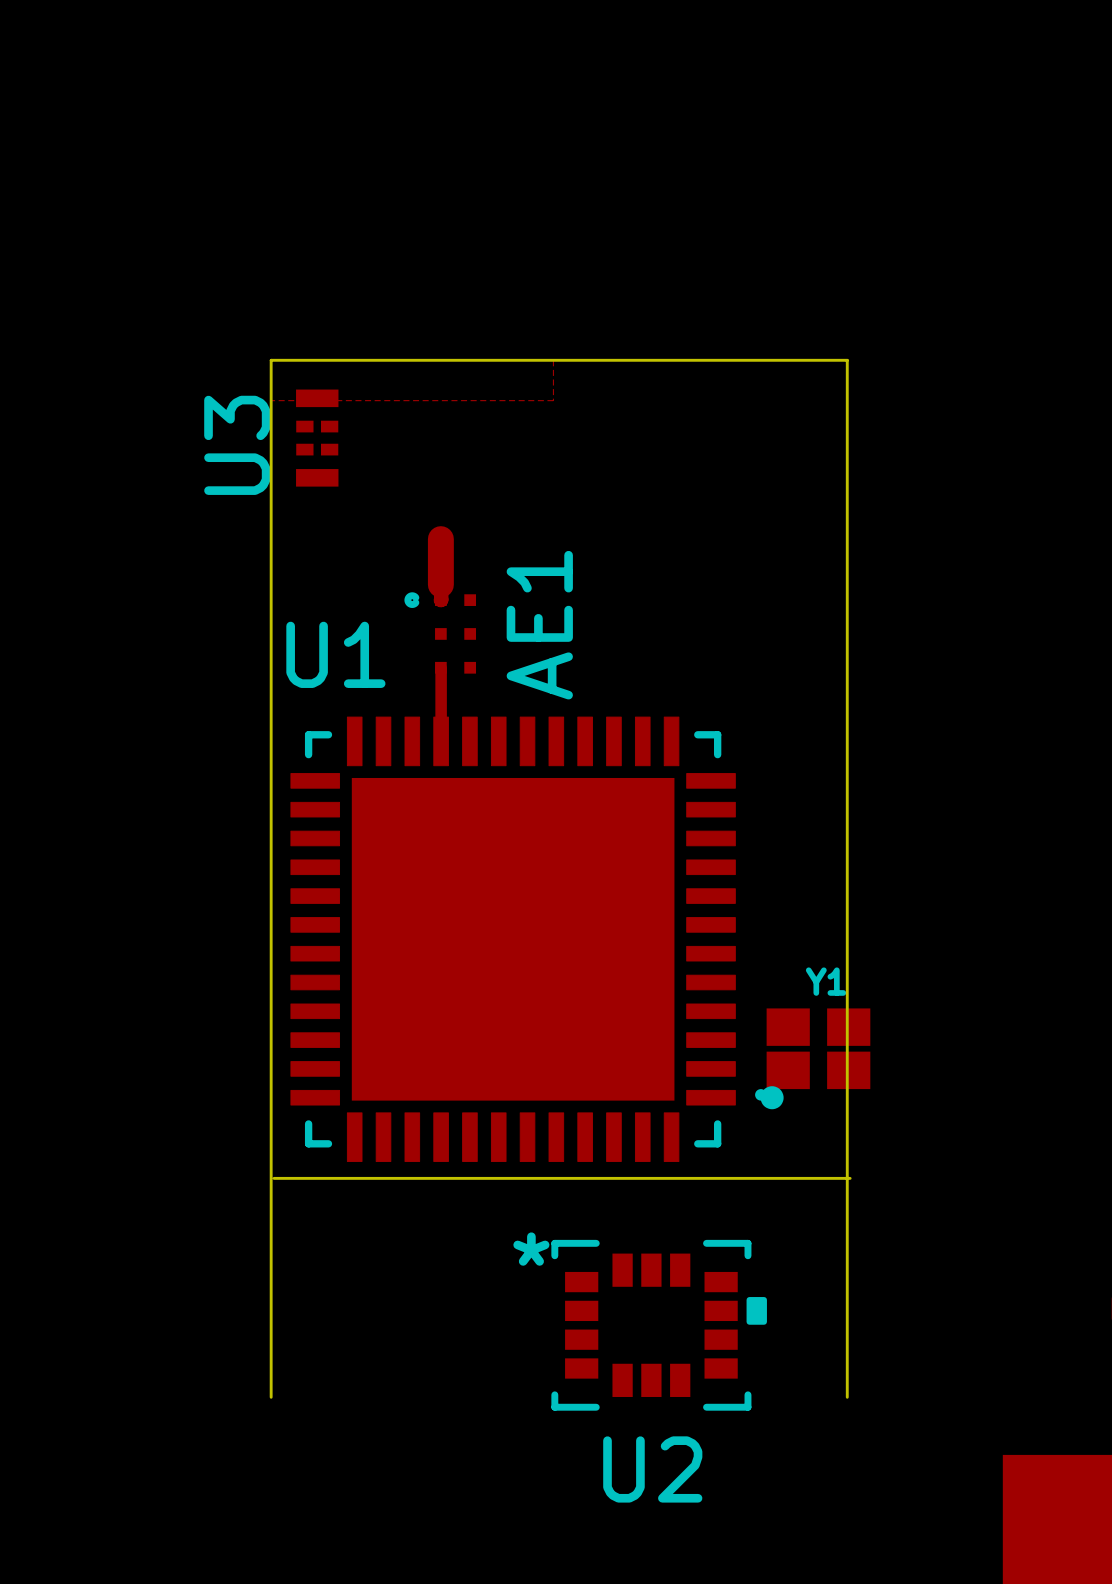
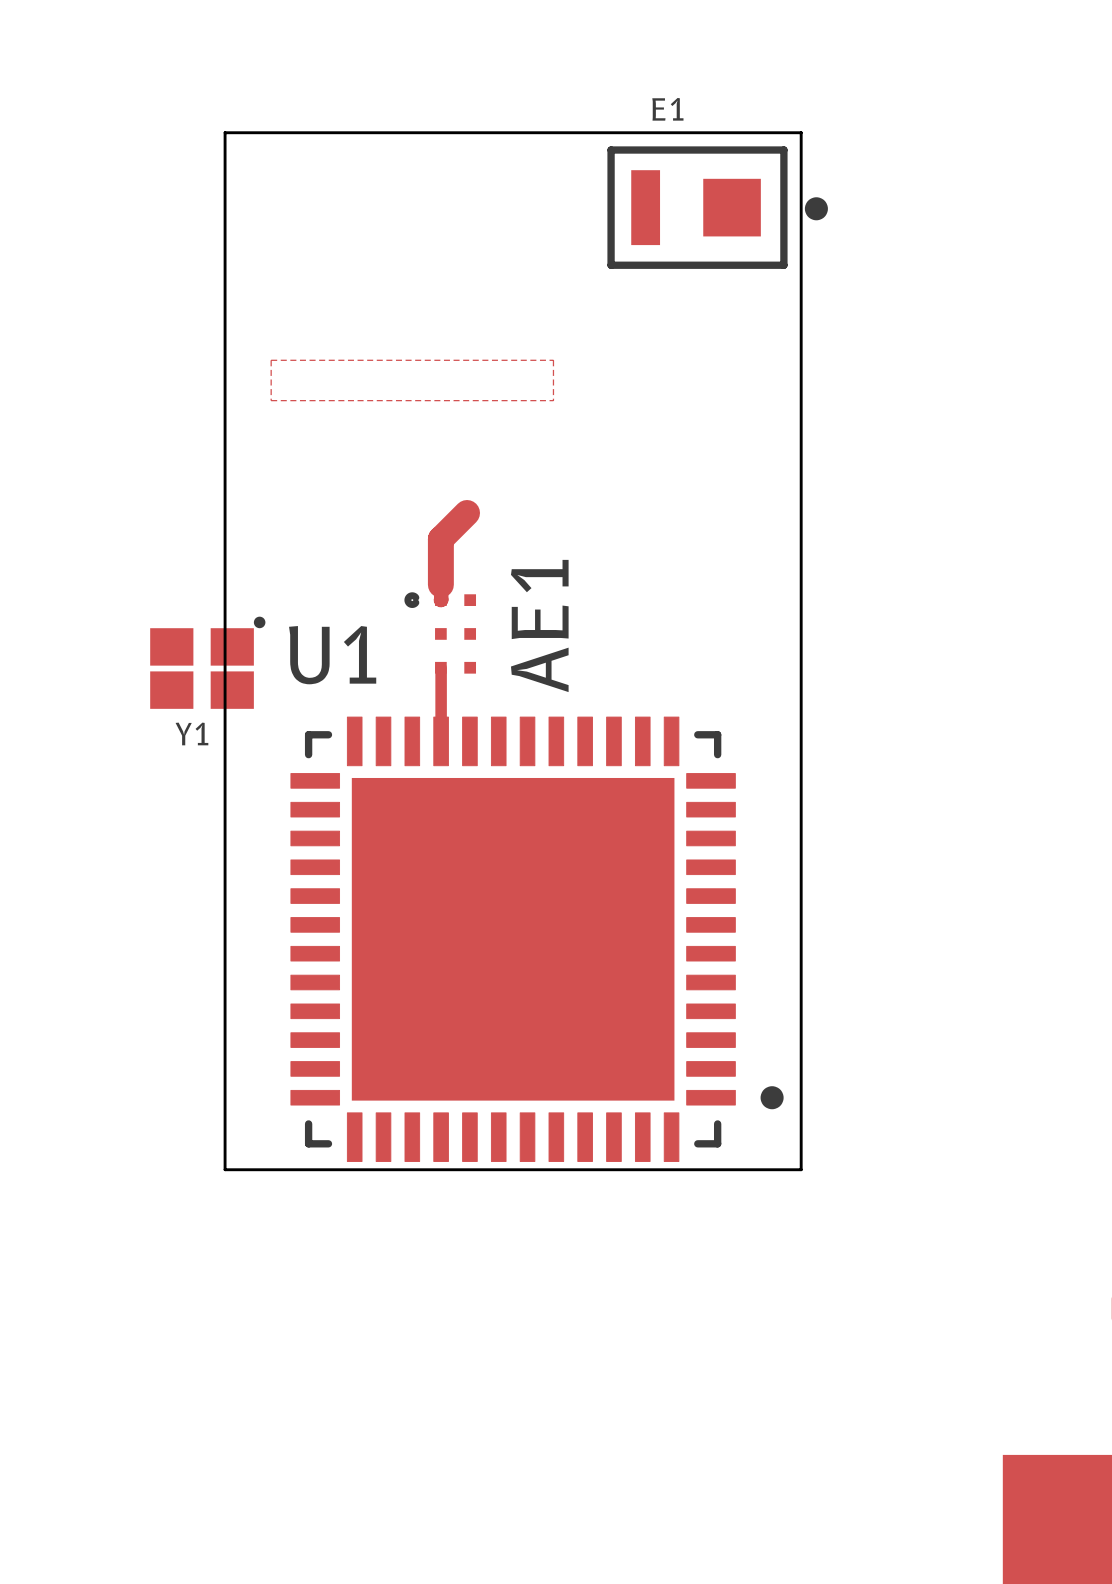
board edge: none -> (225, 132) (225, 1169) (801, 1169) (801, 132) (225, 132)
E1: none -> (717, 207)
U3: (317, 438) -> none
track: none -> (467, 512) (440, 539)
Y1 rotation: 0° (812, 1054) -> 180° (207, 662)
Y1 position: (812, 1054) -> (207, 662)
board edge: (274, 1178) (850, 1178) -> none
U2: (659, 1325) -> none
board edge: (271, 1397) (271, 360) (847, 360) (847, 1397) -> none

